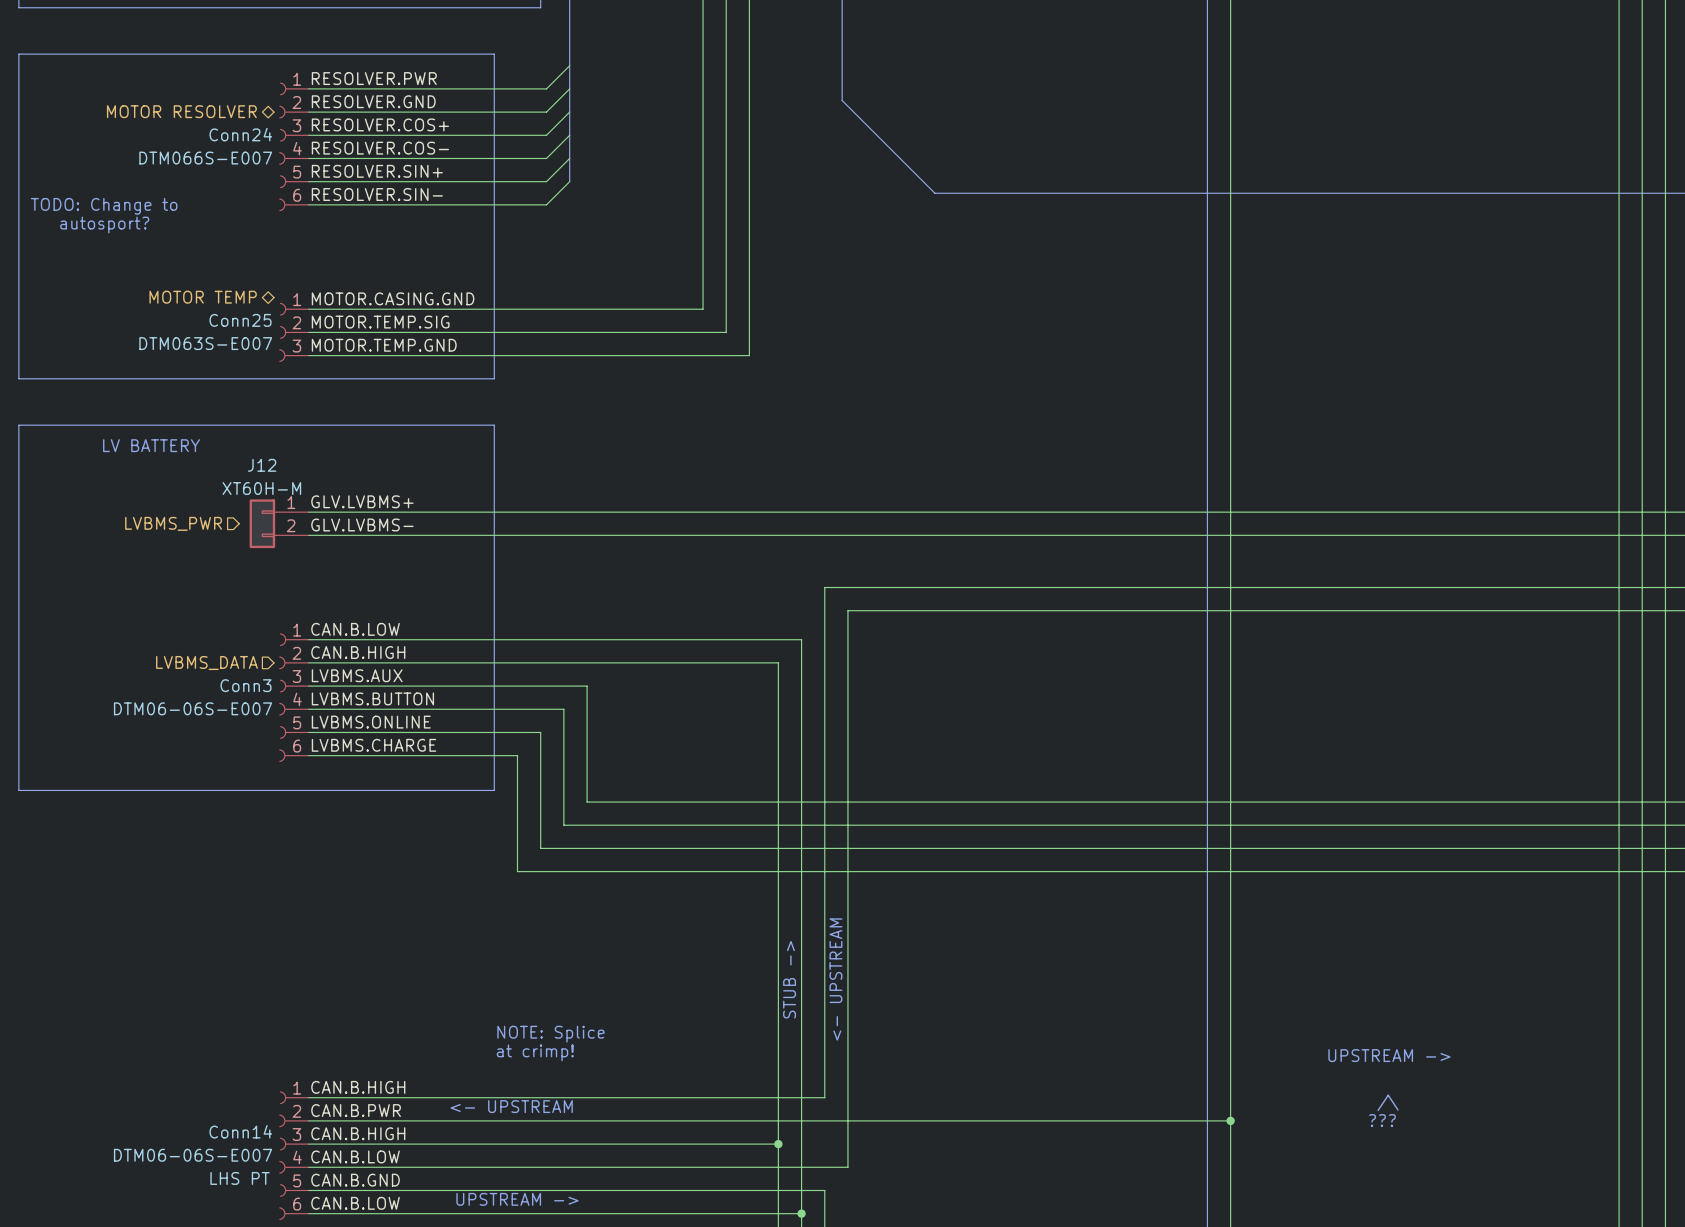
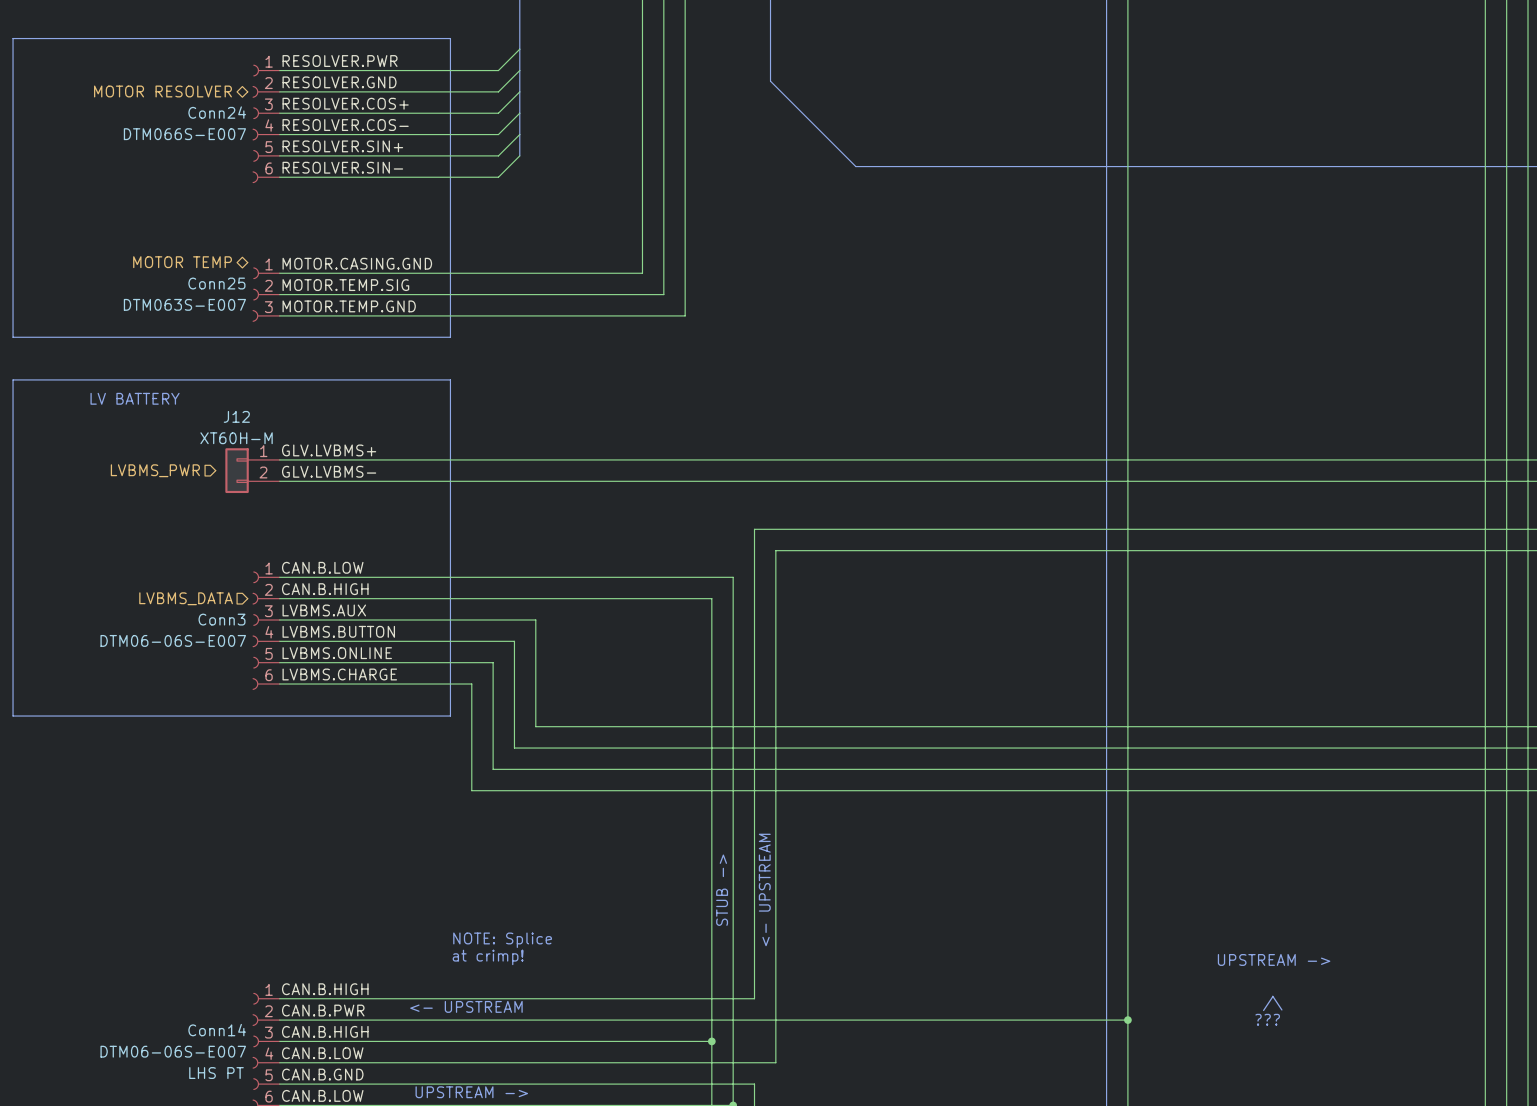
text: TODO: Change to (104, 206) -> none
text: autosport? (104, 225) -> none

